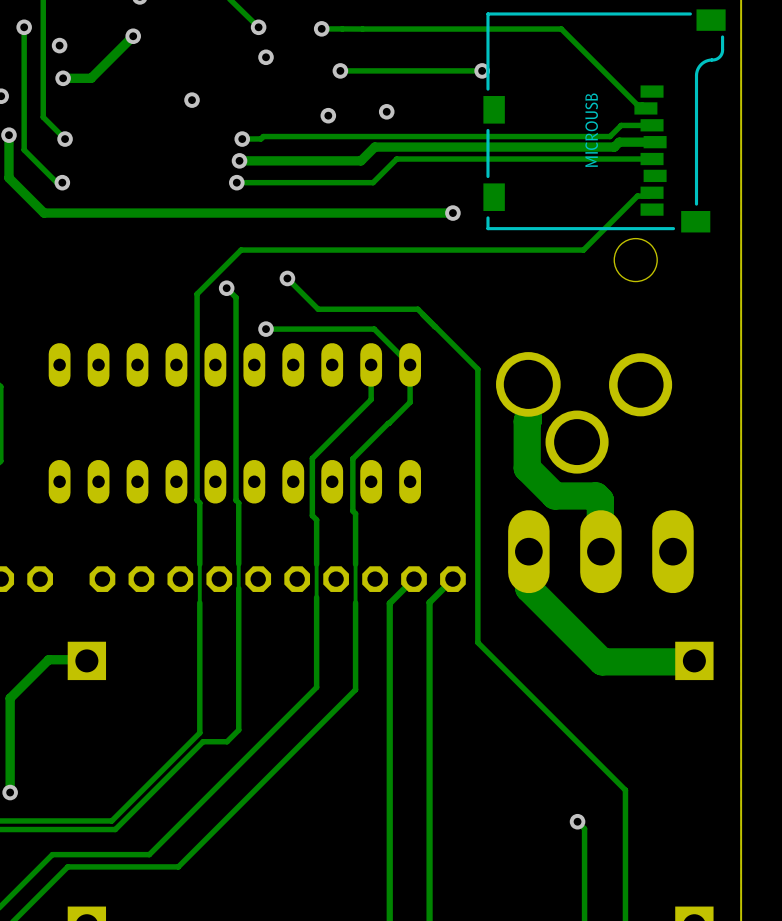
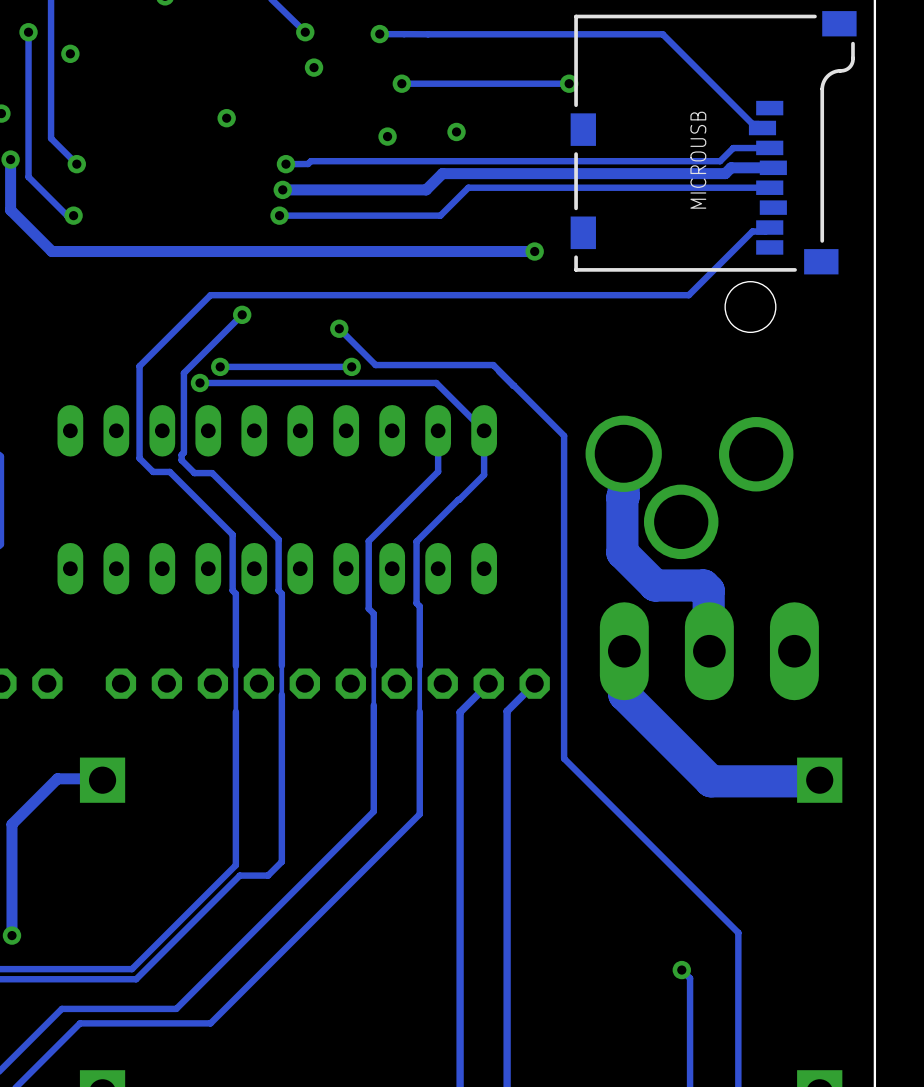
track: (133, 36) (91, 78) (63, 78) -> none
via: (133, 36) -> none
via: (63, 78) -> none
track: (241, 250) (197, 294) (197, 452) -> (284, 295) (210, 295) (139, 366) (139, 458) (153, 471) (169, 471) (232, 534)
via: none -> (242, 314)
track: (226, 288) (236, 297) (236, 457) -> (242, 314) (183, 373) (183, 452) (181, 454) (181, 460) (194, 473) (212, 473) (278, 539)
via: (226, 288) -> none
via: none -> (220, 366)
track: none -> (351, 366) (220, 366)
via: none -> (200, 382)
via position: (266, 329) -> (351, 366)
track: (374, 329) (266, 329) -> (441, 388) (436, 382) (200, 382)

